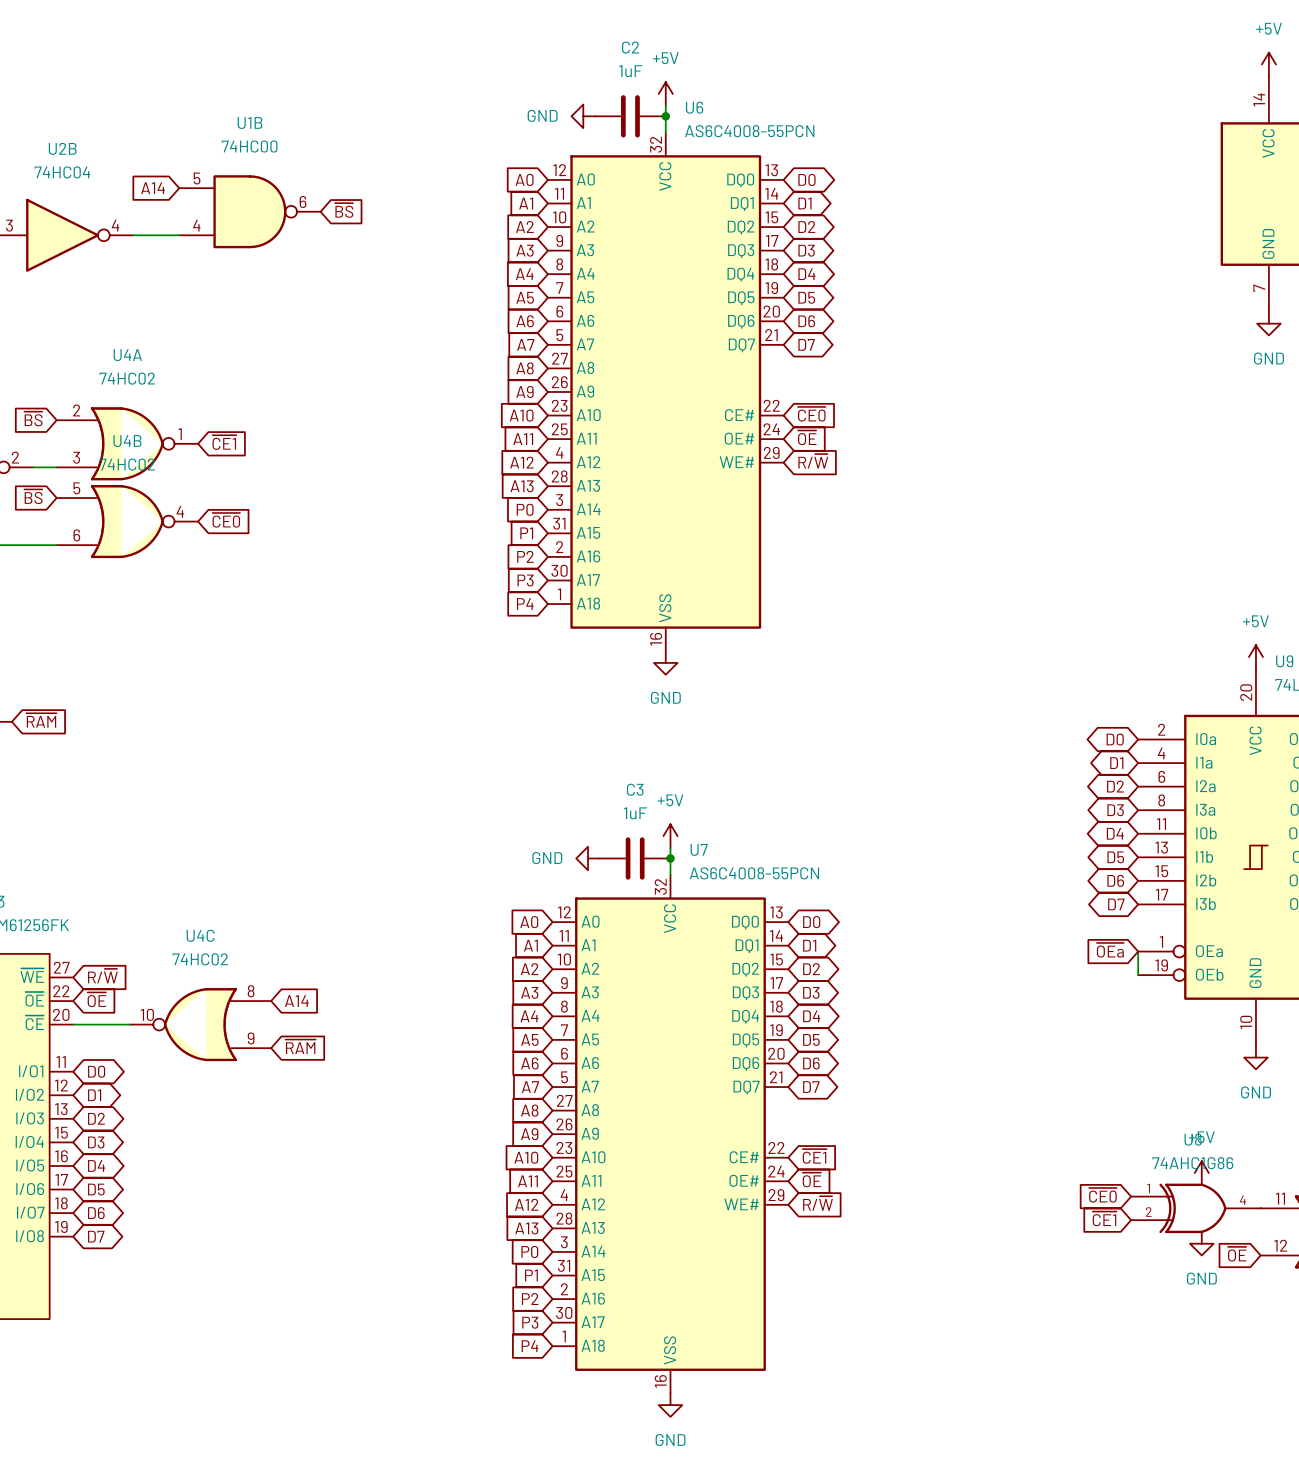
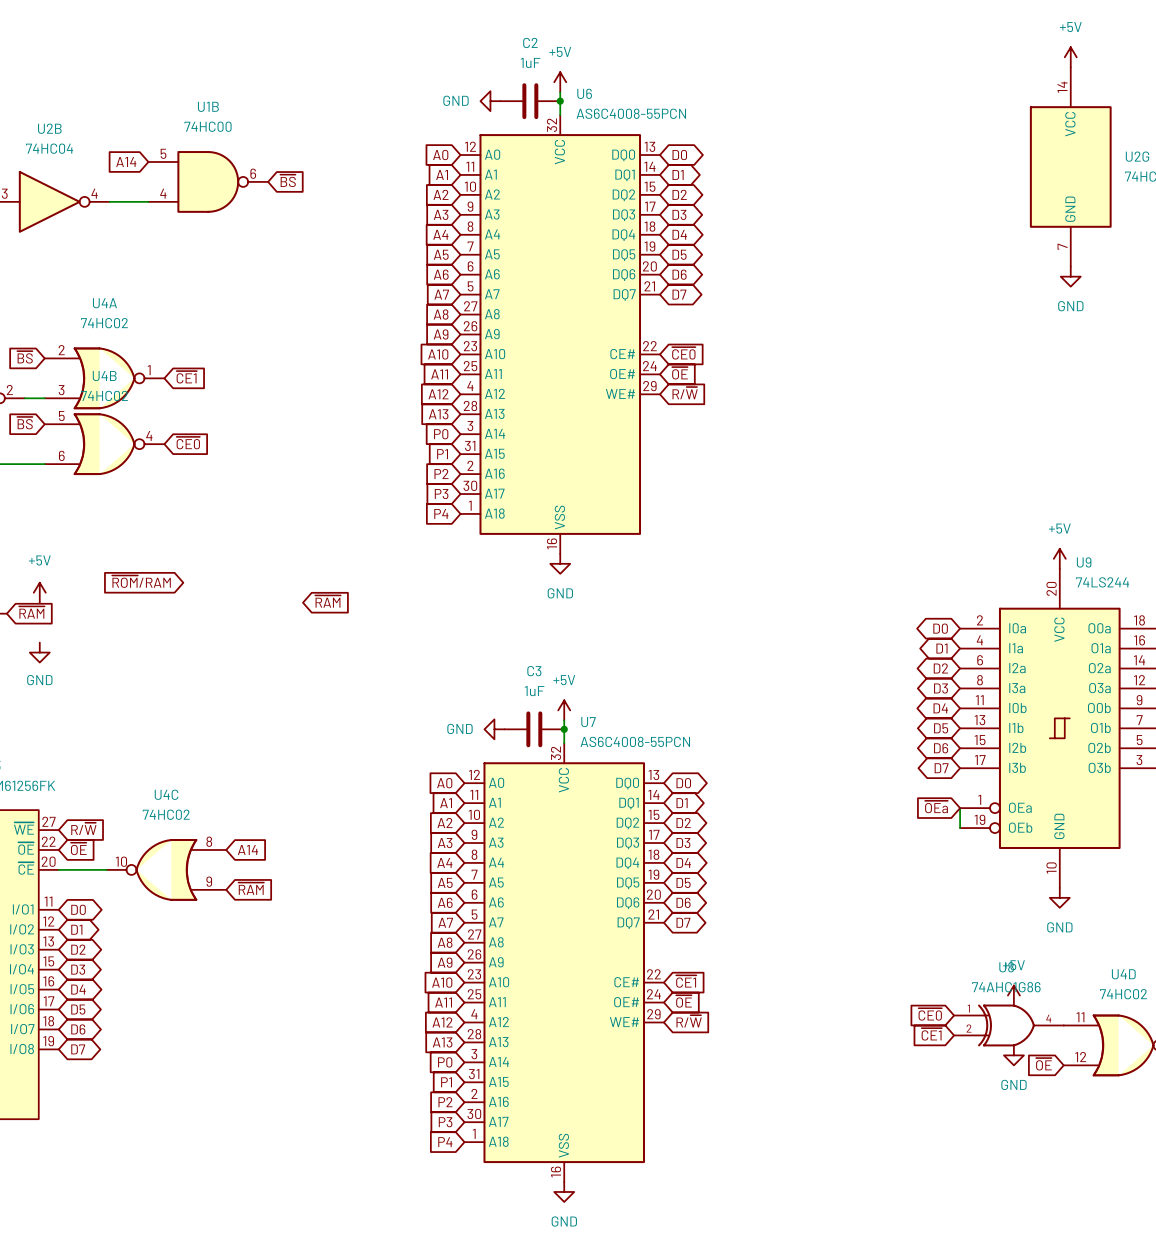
global label: none -> ~{ROM}/RAM (141, 581)
power symbol: none -> +5V (39, 592)
global label: none -> ~{RAM} (327, 601)
power symbol: none -> GND (39, 652)

